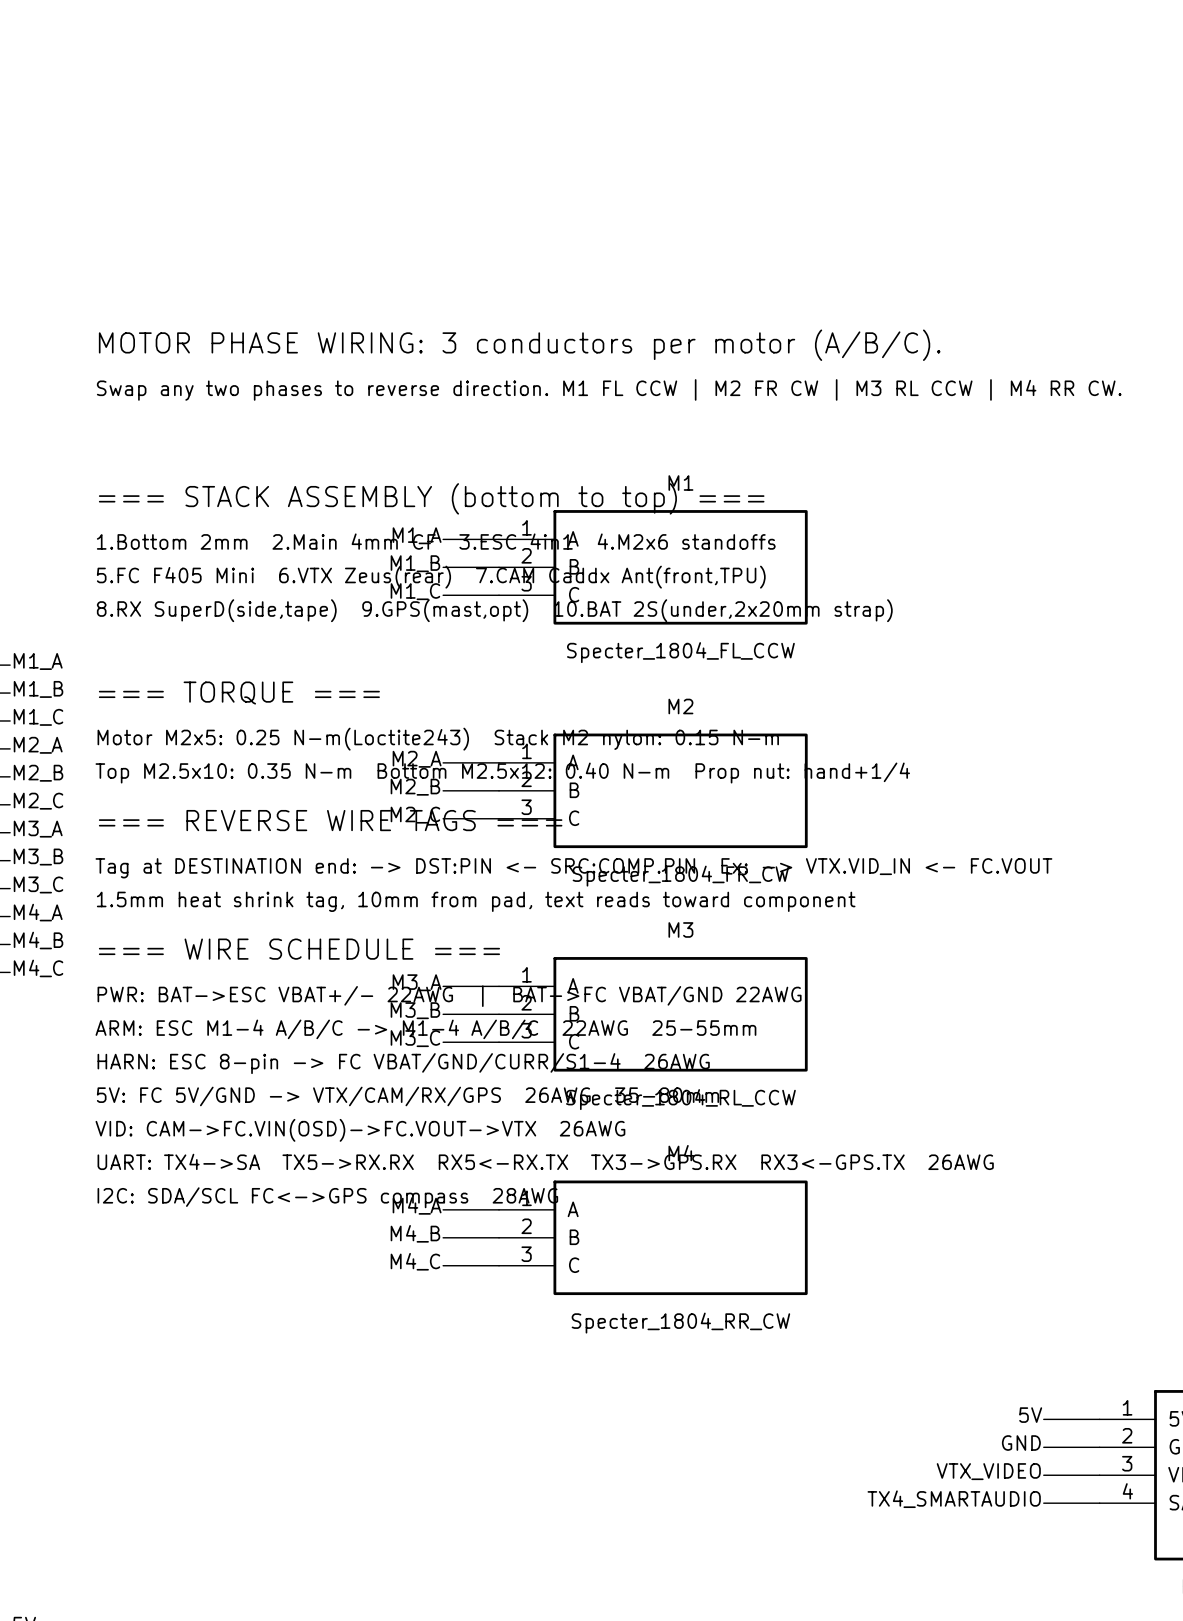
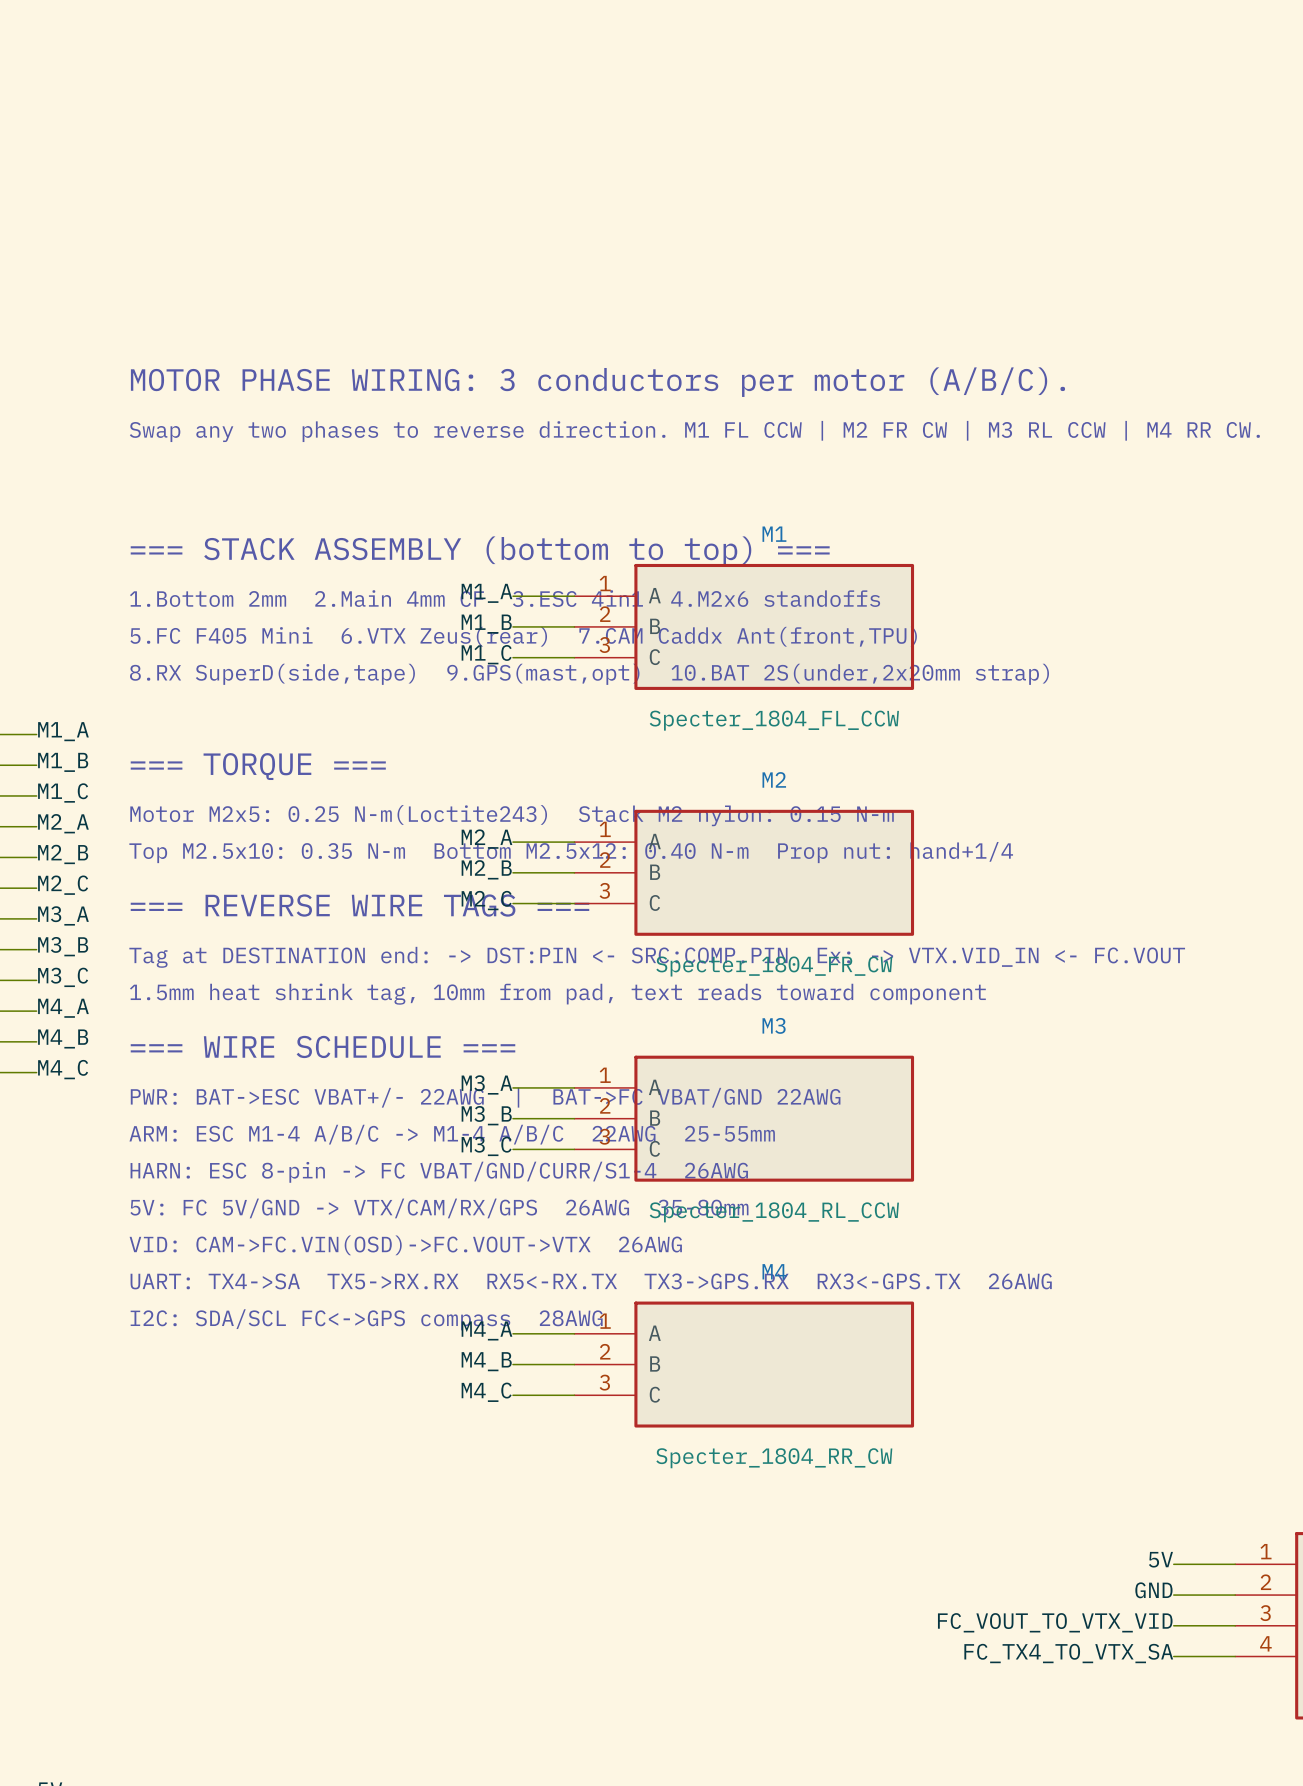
label: VTX_VIDEO (988, 1471) -> FC_VOUT_TO_VTX_VID (1055, 1622)
label: TX4_SMARTAUDIO (954, 1499) -> FC_TX4_TO_VTX_SA (1068, 1653)

